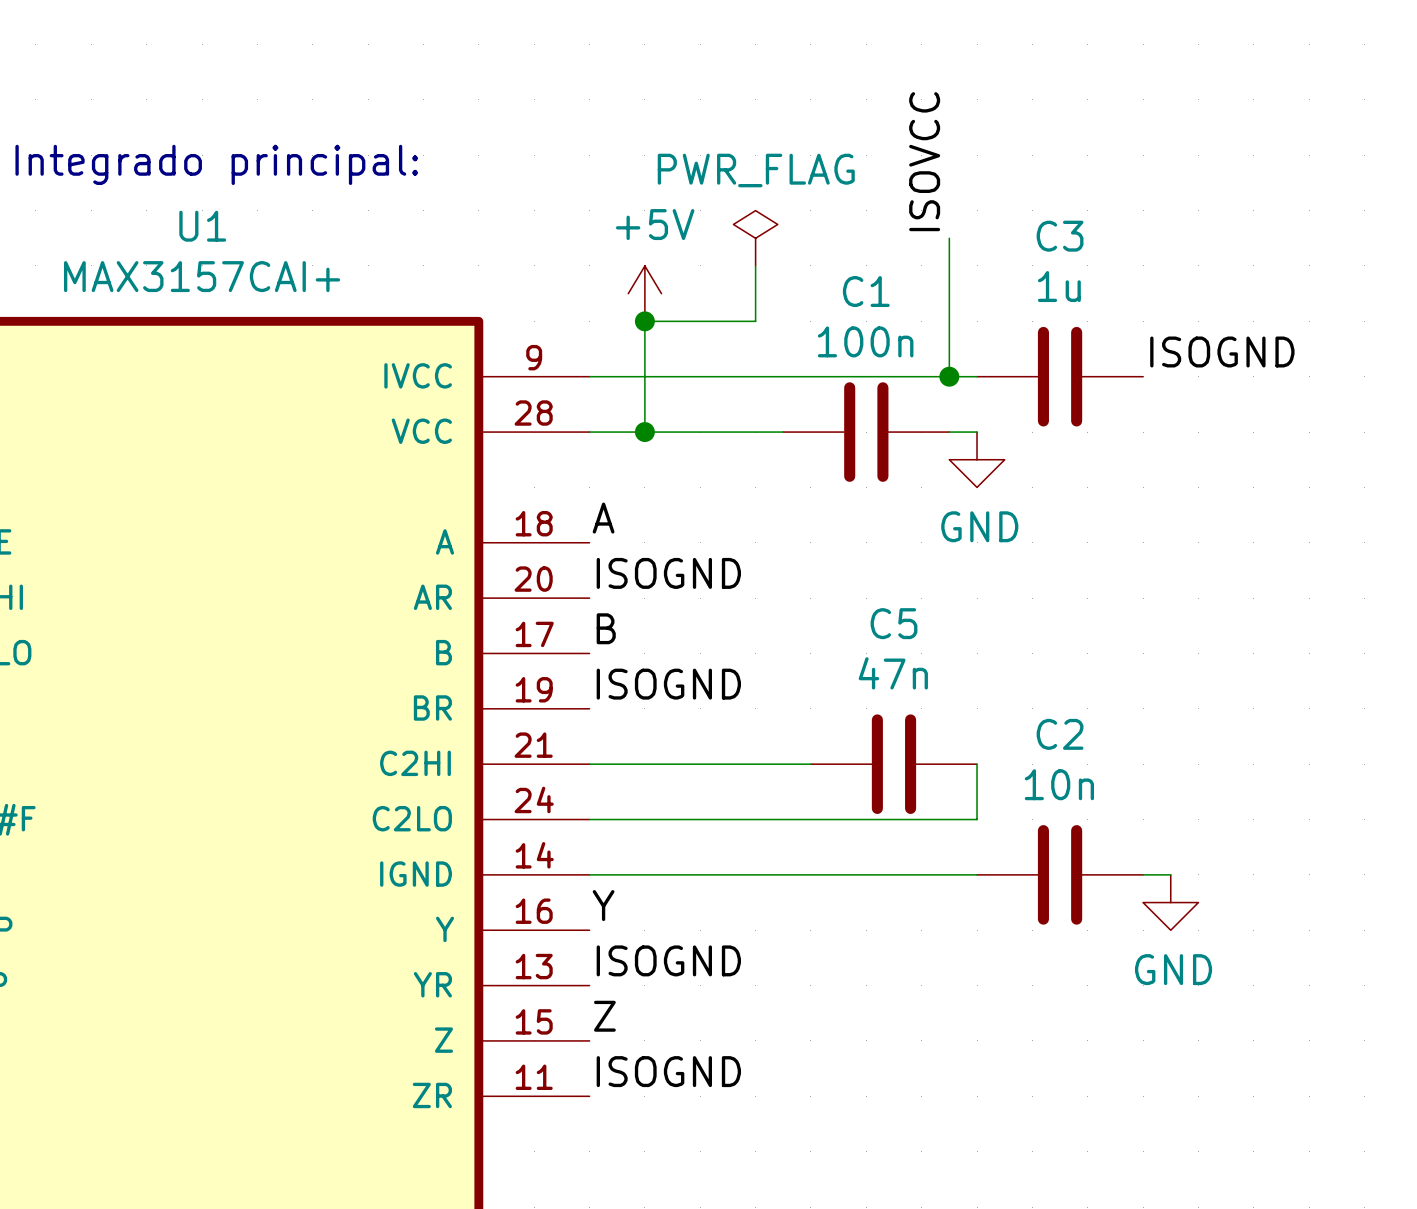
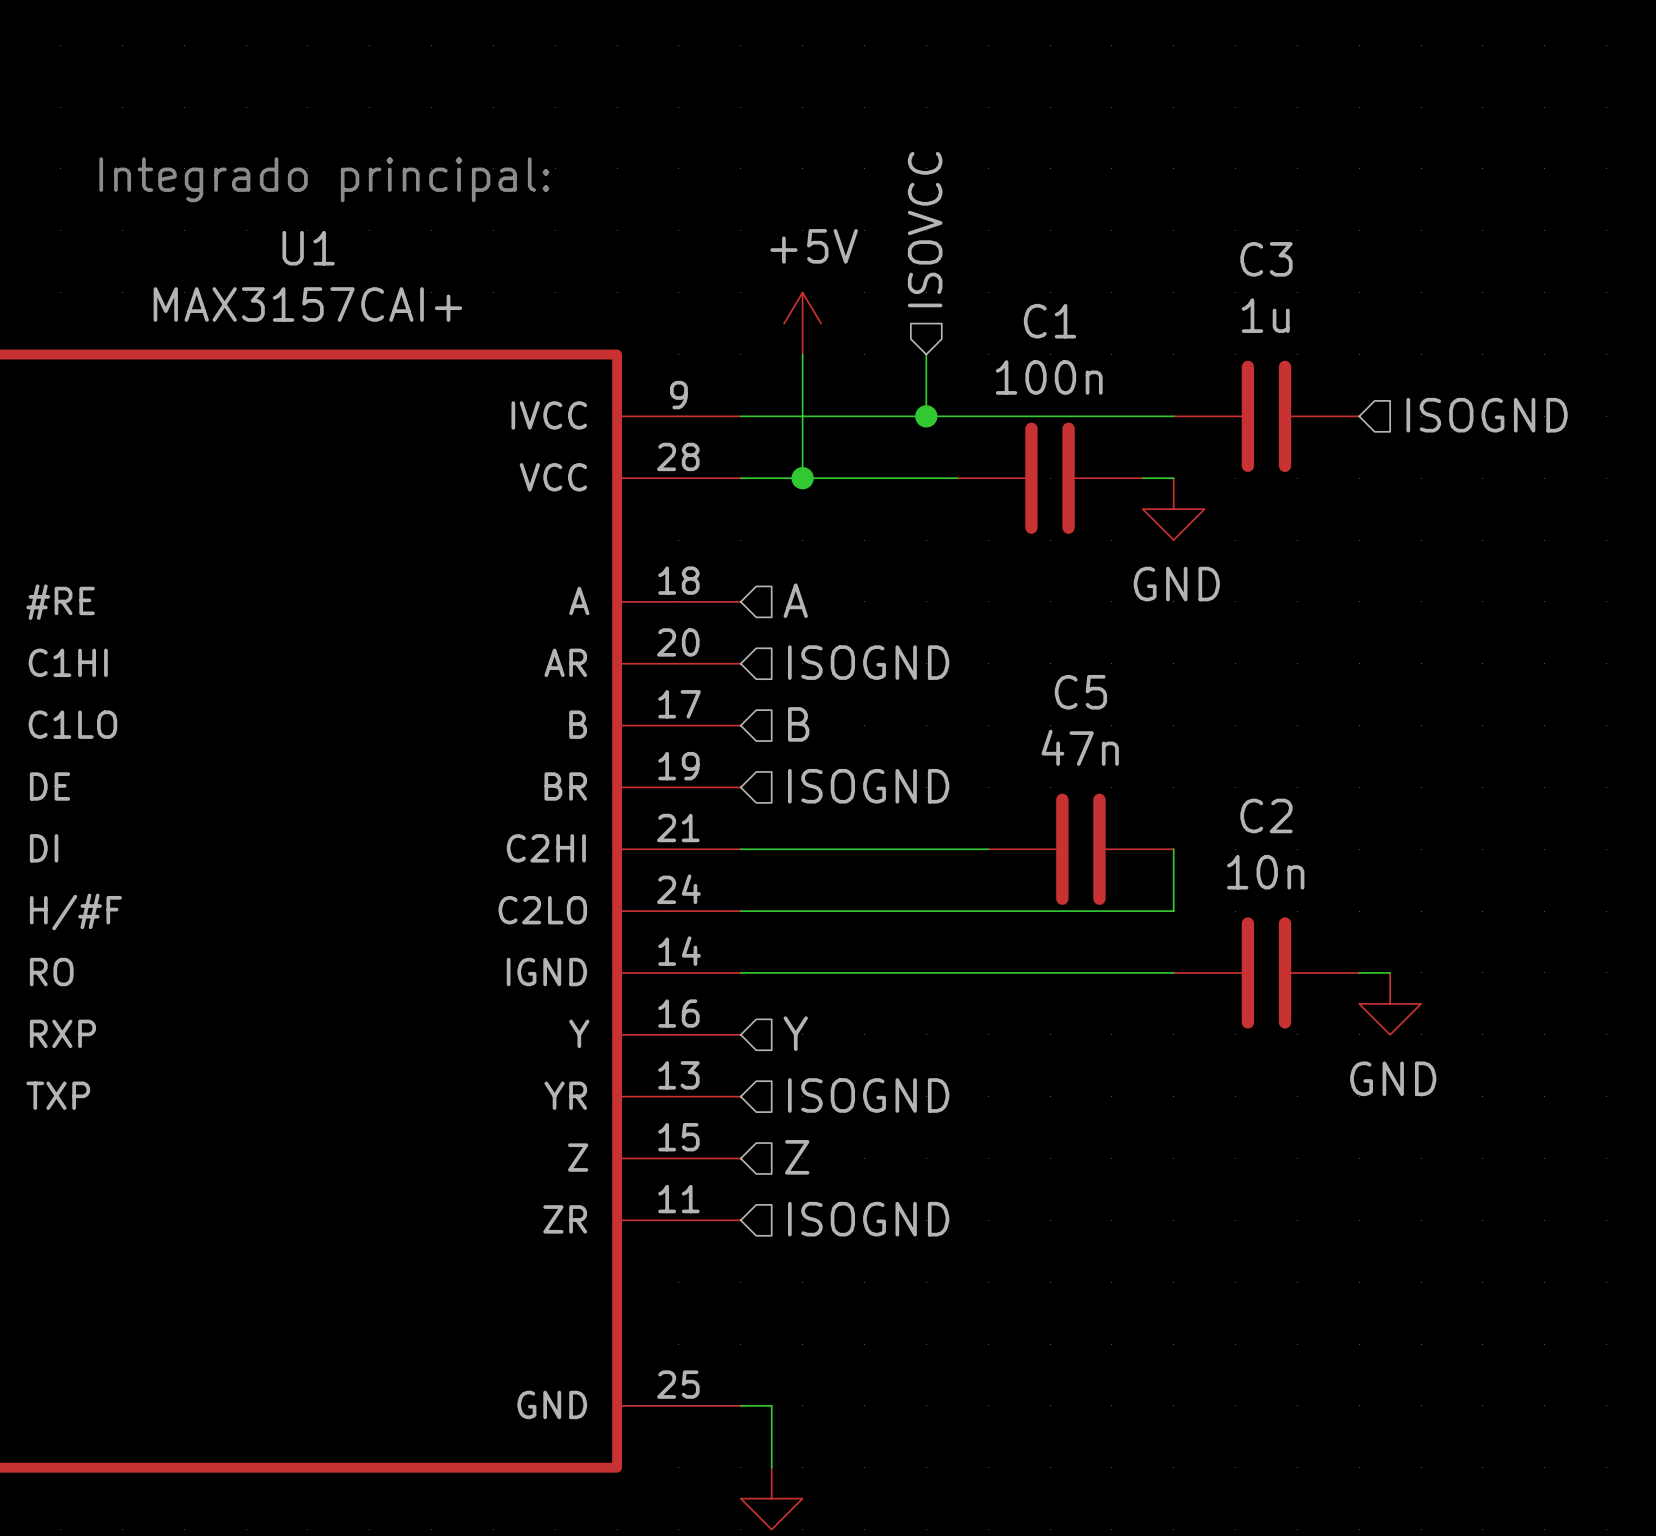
label: ISOVCC (924, 161) -> none
hierarchical label: none -> ISOVCC (925, 229)
power symbol: PWR_FLAG (755, 238) -> none
wire: (949, 238) (949, 376) -> none
wire: (755, 265) (755, 321) (644, 321) -> none
junction: (644, 321) -> none
wire: none -> (926, 354) (926, 416)
label: ISOGND (1222, 352) -> none
hierarchical label: none -> ISOGND (1487, 415)
junction: none -> (926, 416)
junction: (949, 376) -> none
label: A (603, 518) -> none
hierarchical label: none -> A (795, 600)
label: ISOGND (668, 573) -> none
hierarchical label: none -> ISOGND (868, 662)
label: B (606, 628) -> none
hierarchical label: none -> B (798, 724)
label: ISOGND (668, 684) -> none
hierarchical label: none -> ISOGND (868, 786)
label: Y (603, 905) -> none
hierarchical label: none -> Y (795, 1033)
label: ISOGND (668, 960) -> none
hierarchical label: none -> ISOGND (868, 1095)
label: Z (604, 1016) -> none
hierarchical label: none -> Z (797, 1157)
label: ISOGND (668, 1071) -> none
hierarchical label: none -> ISOGND (868, 1219)

